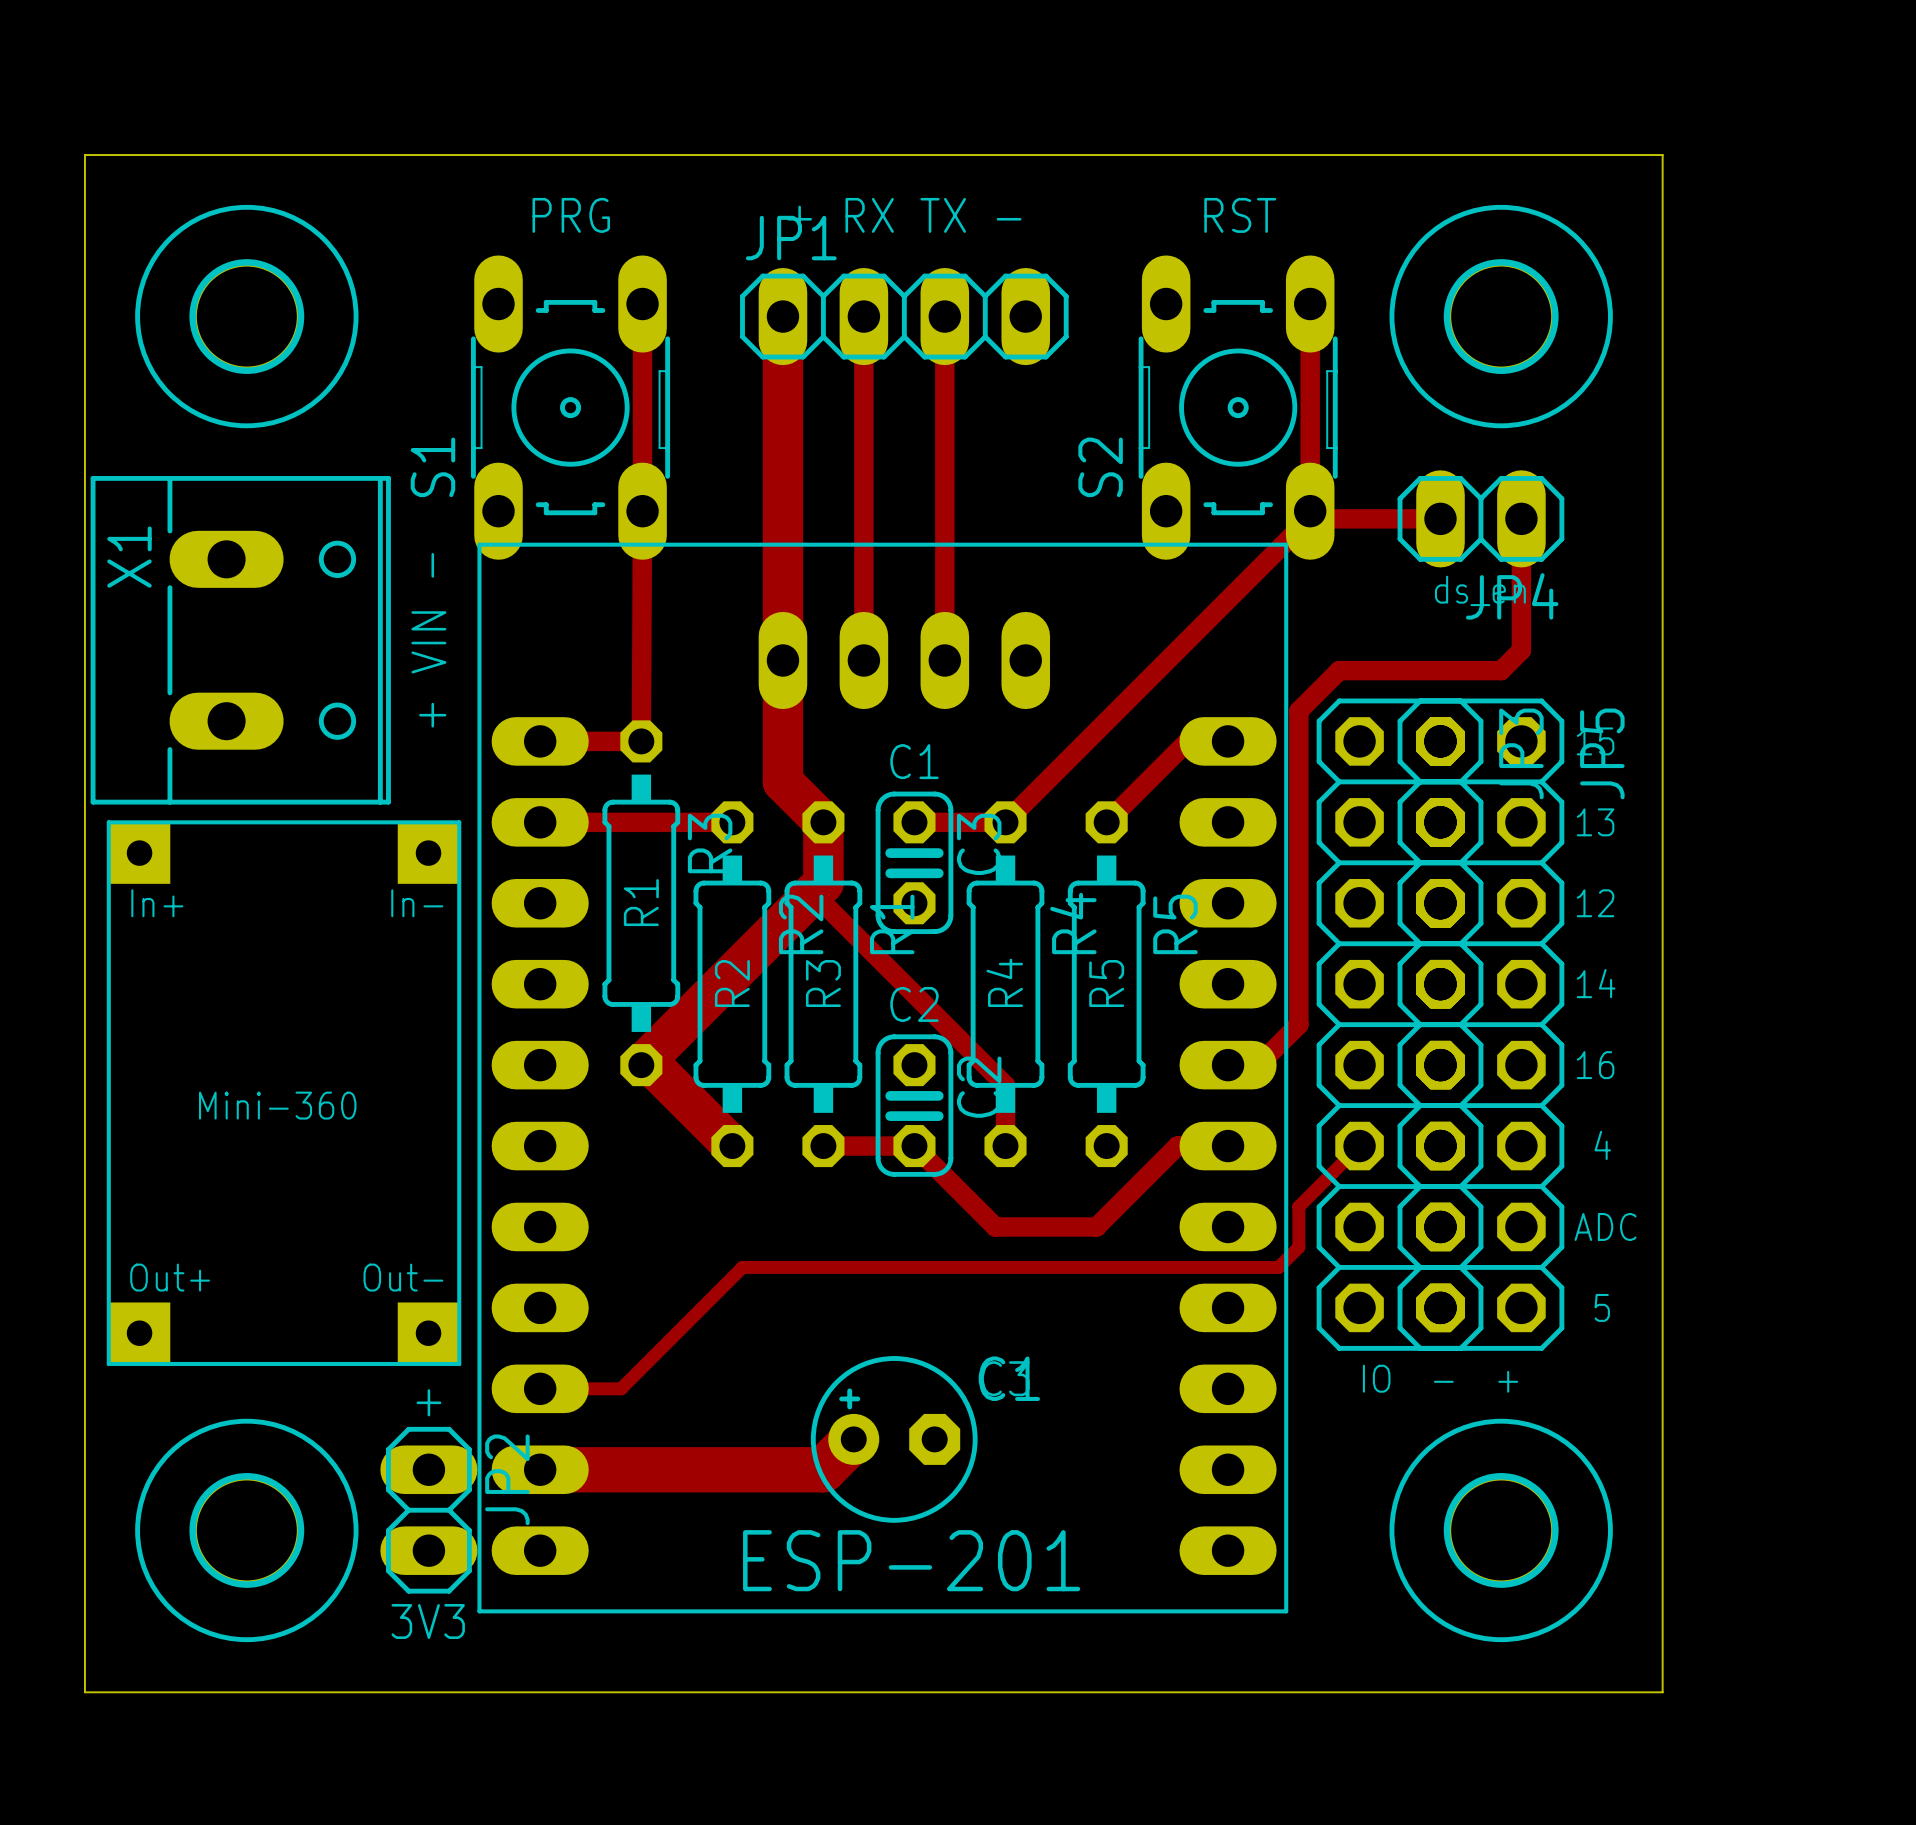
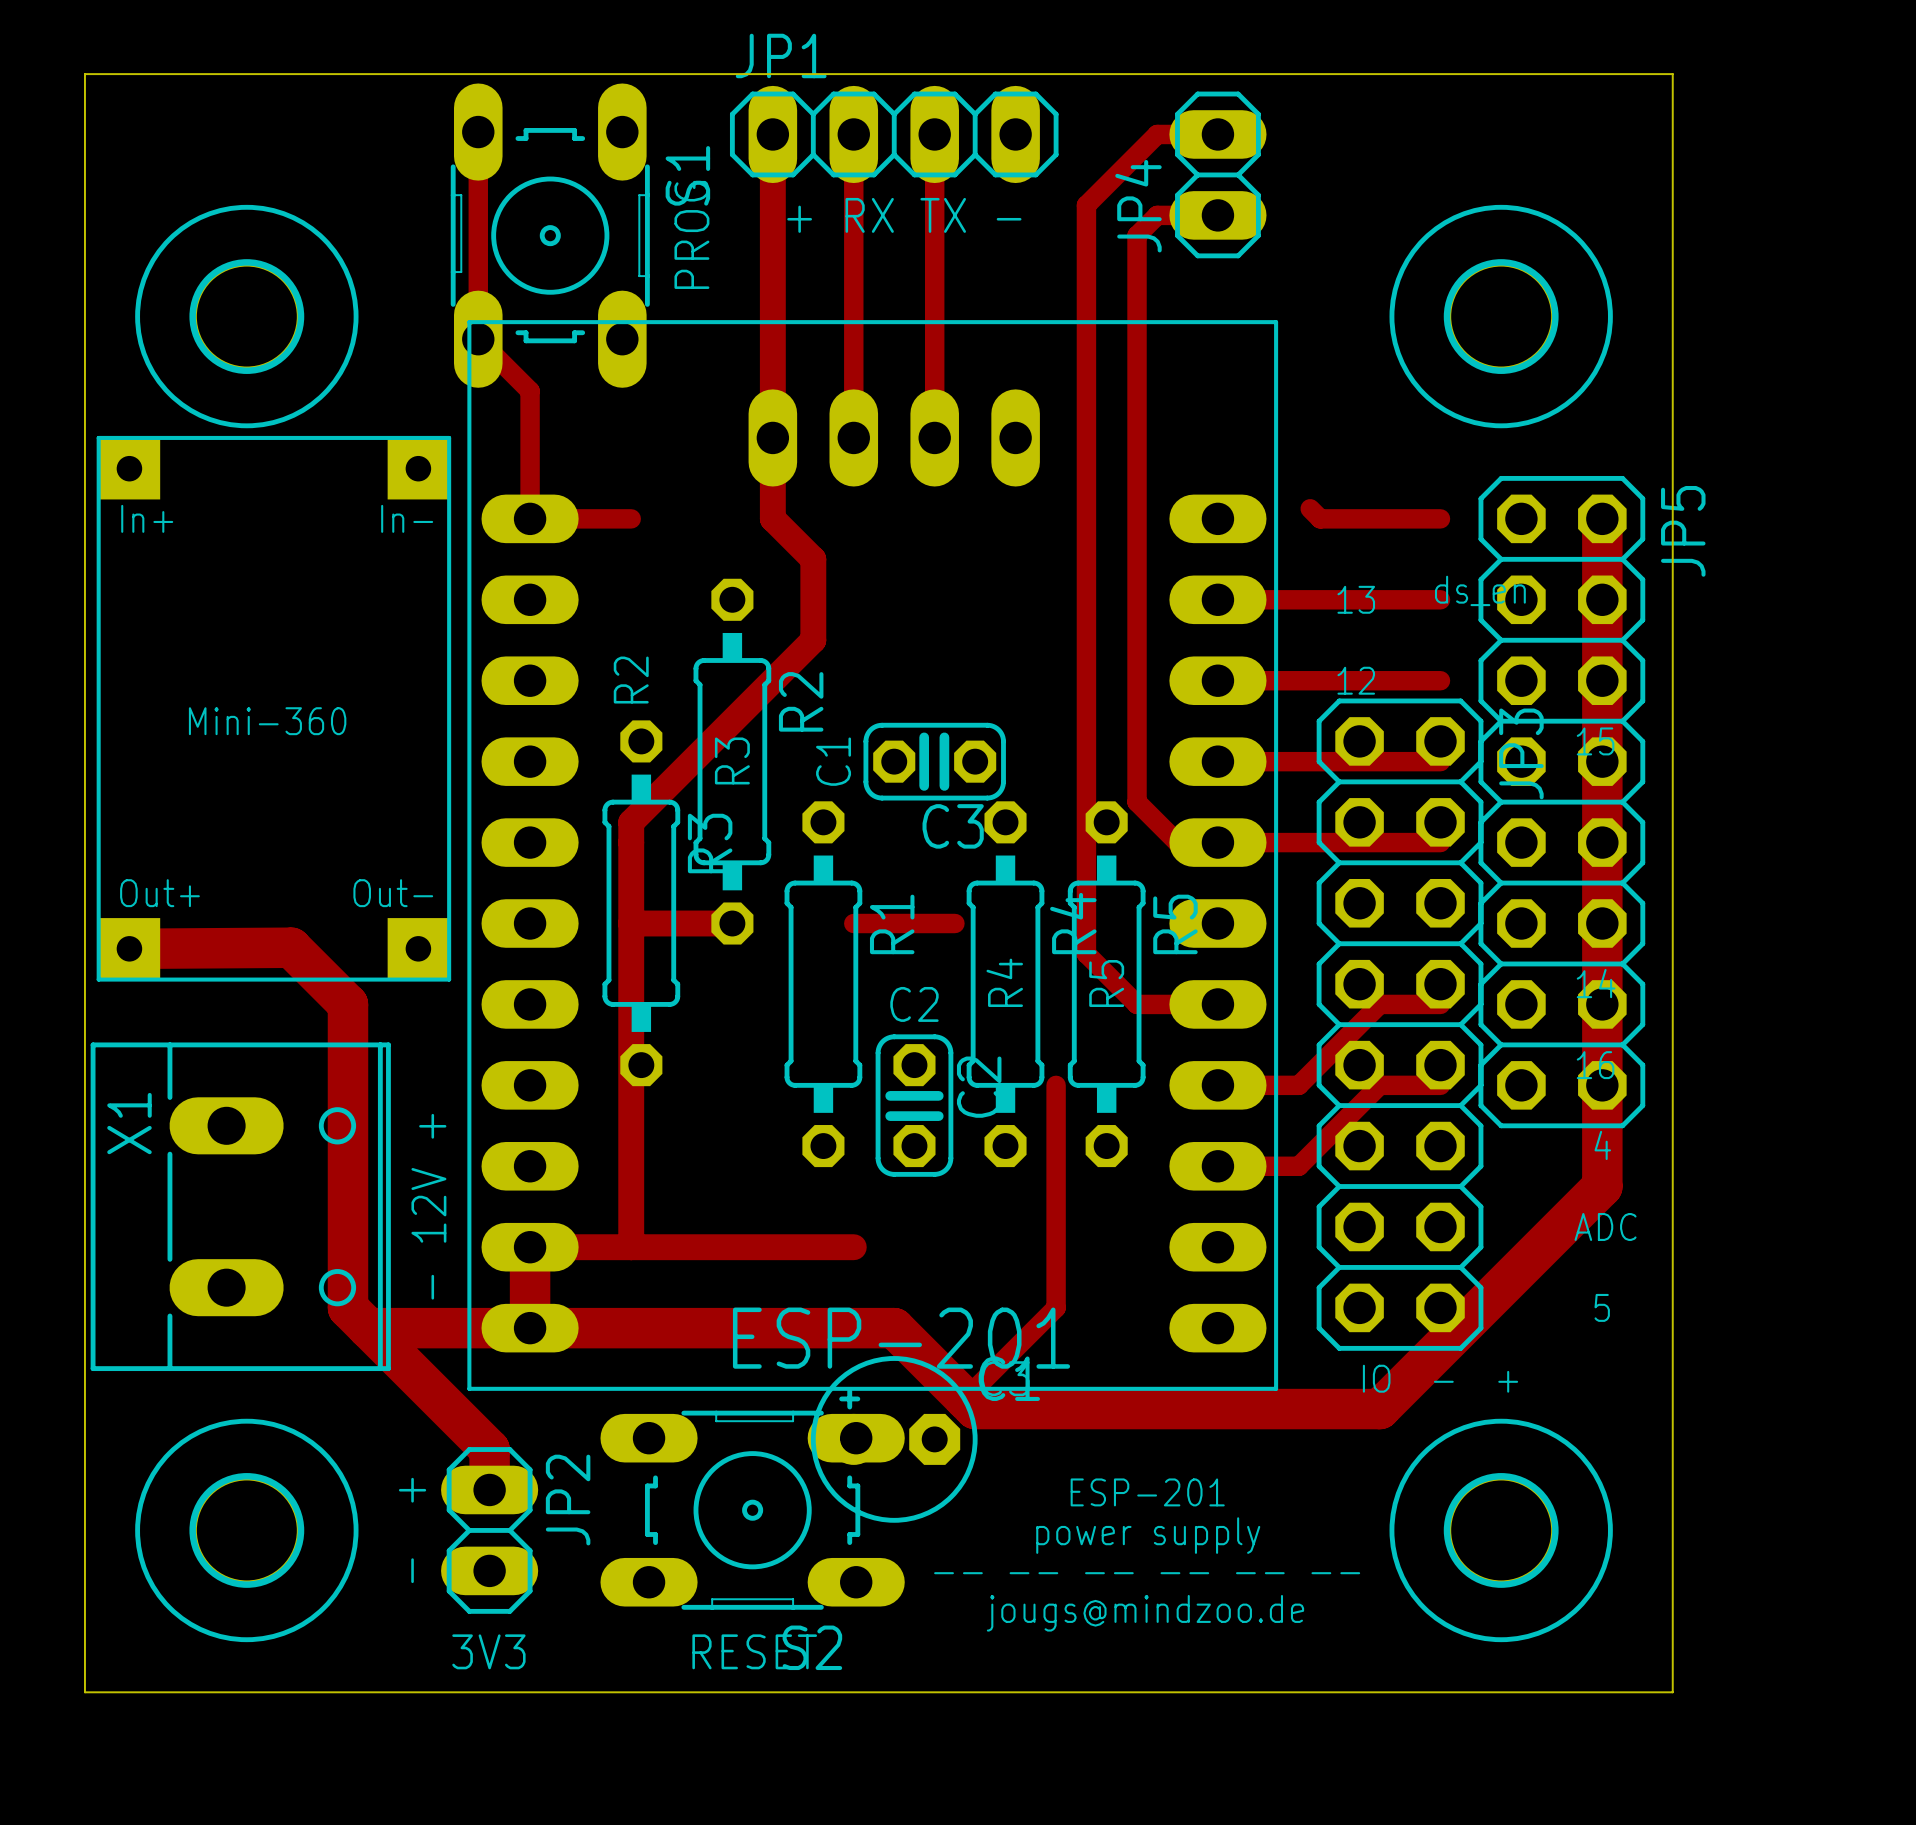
track: none -> (478, 132) (478, 339) (530, 391) (530, 518) (631, 518)
track: none -> (772, 134) (772, 518) (813, 559) (813, 640) (631, 822) (631, 1247)
track: none -> (853, 134) (853, 437)
track: none -> (934, 134) (934, 437)
track: none -> (1217, 134) (1157, 134) (1086, 205) (1086, 953) (1137, 1004) (1217, 1004)
board edge: (84, 155) (1662, 155) (1662, 1692) -> (84, 155) (84, 74) (1672, 74) (1672, 1692) (1662, 1692)
text: PRG (571, 215) -> none
track: none -> (1217, 215) (1157, 215) (1137, 235) (1137, 802) (1177, 842) (1440, 842)
text: RST (1240, 215) -> none
text: none -> PROG (691, 234)
track: (642, 304) (642, 511) -> none
track: (1310, 304) (1310, 517) (1005, 822) (914, 822) -> none
track: (782, 316) (782, 781) (823, 822) (823, 883) (641, 1065) (651, 1065) (732, 1146) -> none
track: (863, 316) (863, 660) -> none
JP1 position: (904, 316) -> (894, 134)
track: (944, 316) (944, 660) -> none
S1 rotation: 0° (570, 407) -> 180° (550, 235)
S2 rotation: 0° (1238, 407) -> 90° counterclockwise (752, 1510)
S2 position: (1238, 407) -> (752, 1510)
track: (642, 499) (641, 741) (540, 741) -> none
JP4 rotation: 0° (1480, 518) -> 90° clockwise (1217, 174)
JP4 position: (1480, 518) -> (1217, 174)
track: (1521, 518) (1521, 650) (1501, 670) (1339, 670) (1298, 711) (1298, 1024) (1258, 1065) (1228, 1065) -> none
track: none -> (1602, 518) (1602, 1186) (1379, 1409) (975, 1409) (894, 1328) (368, 1328)
track: none -> (1217, 599) (1440, 599)
X1 position: (240, 640) -> (240, 1206)
text: + VIN - (428, 640) -> none
track: none -> (1217, 680) (1440, 680)
track: (1228, 741) (1187, 741) (1106, 822) -> none
text rotation: 0° (914, 761) -> 90° counterclockwise (833, 761)
text position: C1 (914, 761) -> C1 (833, 761)
track: none -> (1217, 761) (1440, 761)
track: (540, 822) (732, 822) -> none
text position: 13 (1595, 822) -> 13 (1356, 599)
C3 rotation: 0° (914, 862) -> 90° clockwise (934, 761)
C3 position: (914, 862) -> (934, 761)
track: (813, 893) (1005, 1085) (1005, 1146) -> none
text: R1 (641, 902) -> none
text position: 12 (1595, 903) -> 12 (1356, 680)
track: none -> (631, 923) (732, 923)
track: none -> (853, 923) (954, 923)
track: none -> (129, 948) (291, 947) (347, 1004) (347, 1307) (489, 1449) (489, 1489)
text position: R2 (732, 983) -> R2 (631, 680)
text position: R3 (823, 983) -> R3 (732, 760)
R2 position: (732, 984) -> (732, 761)
track: none -> (1440, 1004) (1379, 1004) (1298, 1085) (1217, 1085)
JP5 position: (1480, 1024) -> (1561, 802)
part position: (882, 1078) -> (872, 855)
track: none -> (1056, 1085) (1056, 1307) (965, 1398)
track: none -> (1440, 1085) (1379, 1085) (1298, 1166) (1217, 1166)
part position: (284, 1093) -> (273, 708)
track: (823, 1146) (914, 1146) (995, 1226) (1096, 1226) (1177, 1146) (1228, 1146) -> none
track: (1359, 1146) (1298, 1206) (1298, 1247) (1278, 1267) (742, 1267) (621, 1388) (540, 1388) -> none
text: none -> - 12V + (428, 1206)
track: none -> (853, 1247) (530, 1247) (530, 1328)
text: + (428, 1402) -> none
track: (853, 1439) (823, 1469) (540, 1469) -> none
text: none -> ESP-201 (1147, 1492)
JP2 position: (428, 1510) -> (489, 1530)
text: none -> - + (412, 1530)
text: none -> power supply (1148, 1535)
text: none -> -- -- -- -- -- -- (1147, 1573)
text: none -> jougs@mindzoo.de (1145, 1613)
text position: 3V3 (428, 1621) -> 3V3 (488, 1651)
text: none -> RESET (754, 1651)

